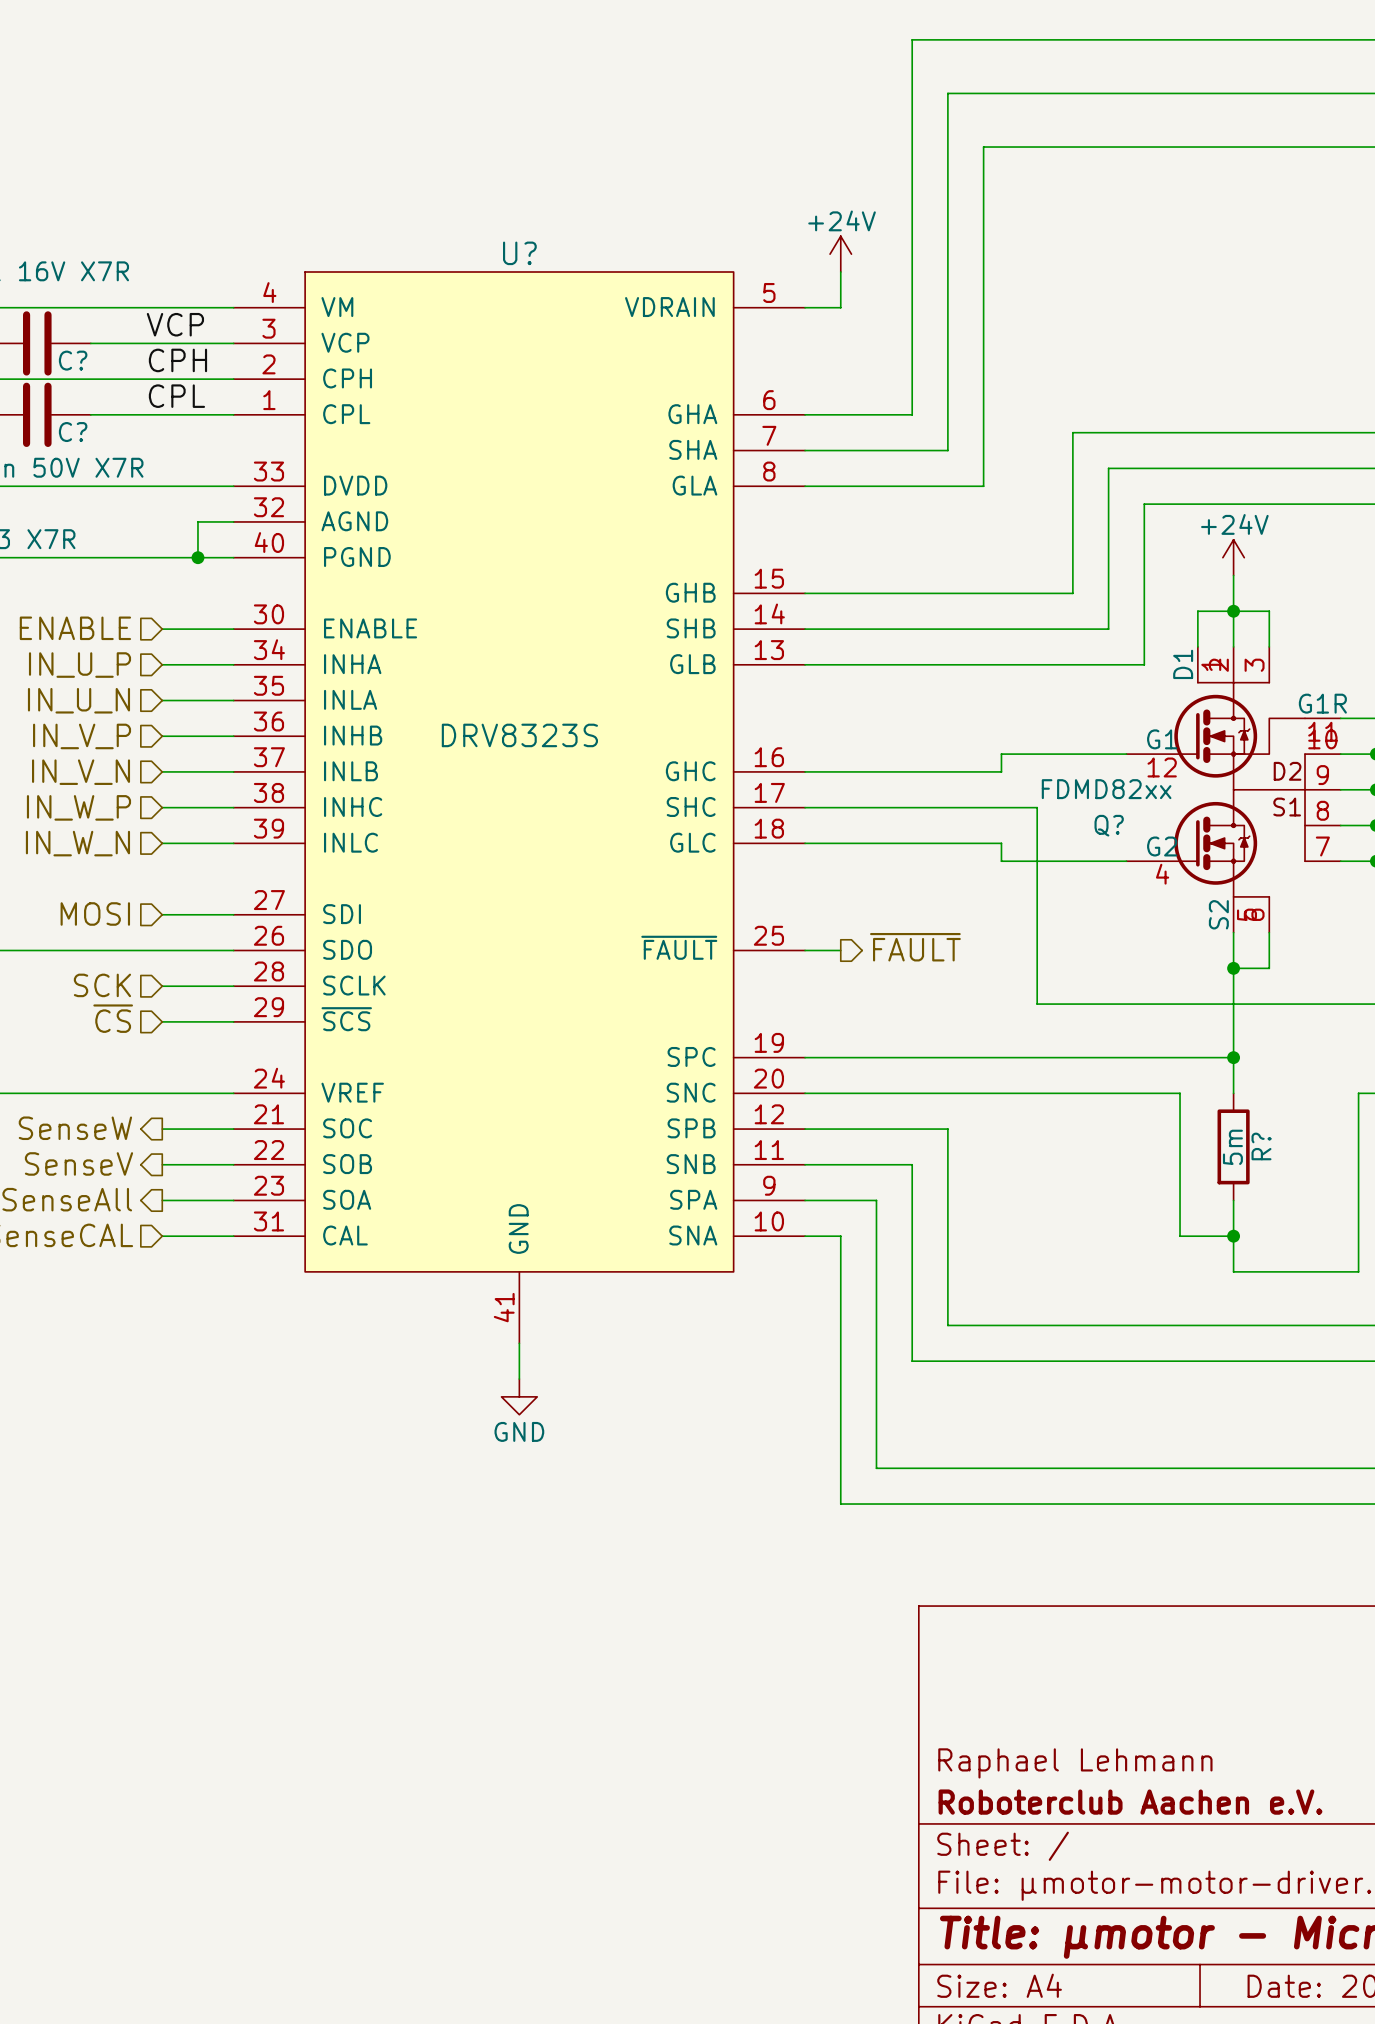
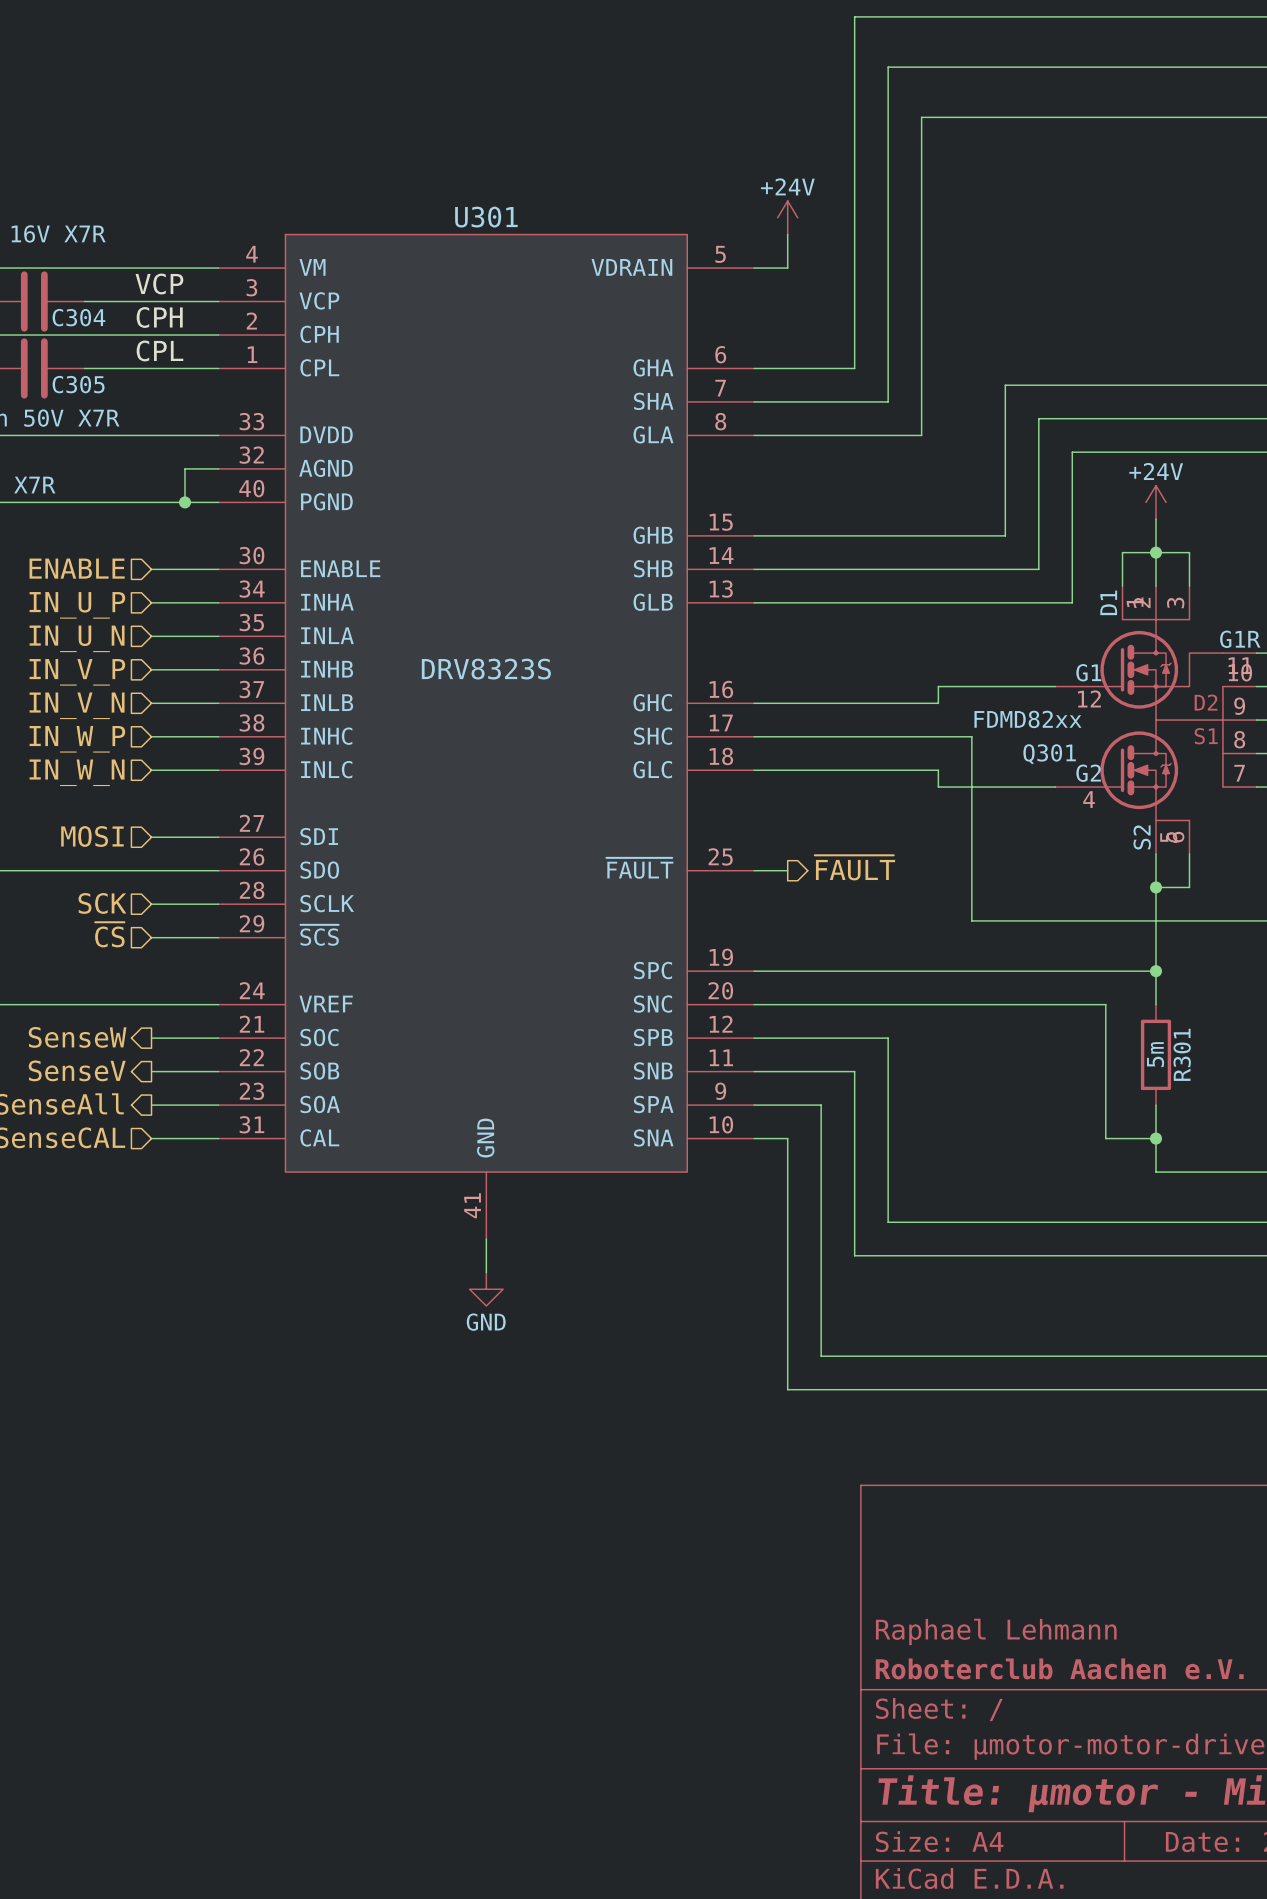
U? name: U? (519, 253) -> U301 (486, 217)
C? name: C? (73, 360) -> C304 (78, 317)
C? name: C? (73, 432) -> C305 (78, 384)
Q? name: Q? (1109, 825) -> Q301 (1049, 754)
R? name: R? (1261, 1146) -> R301 (1182, 1054)

